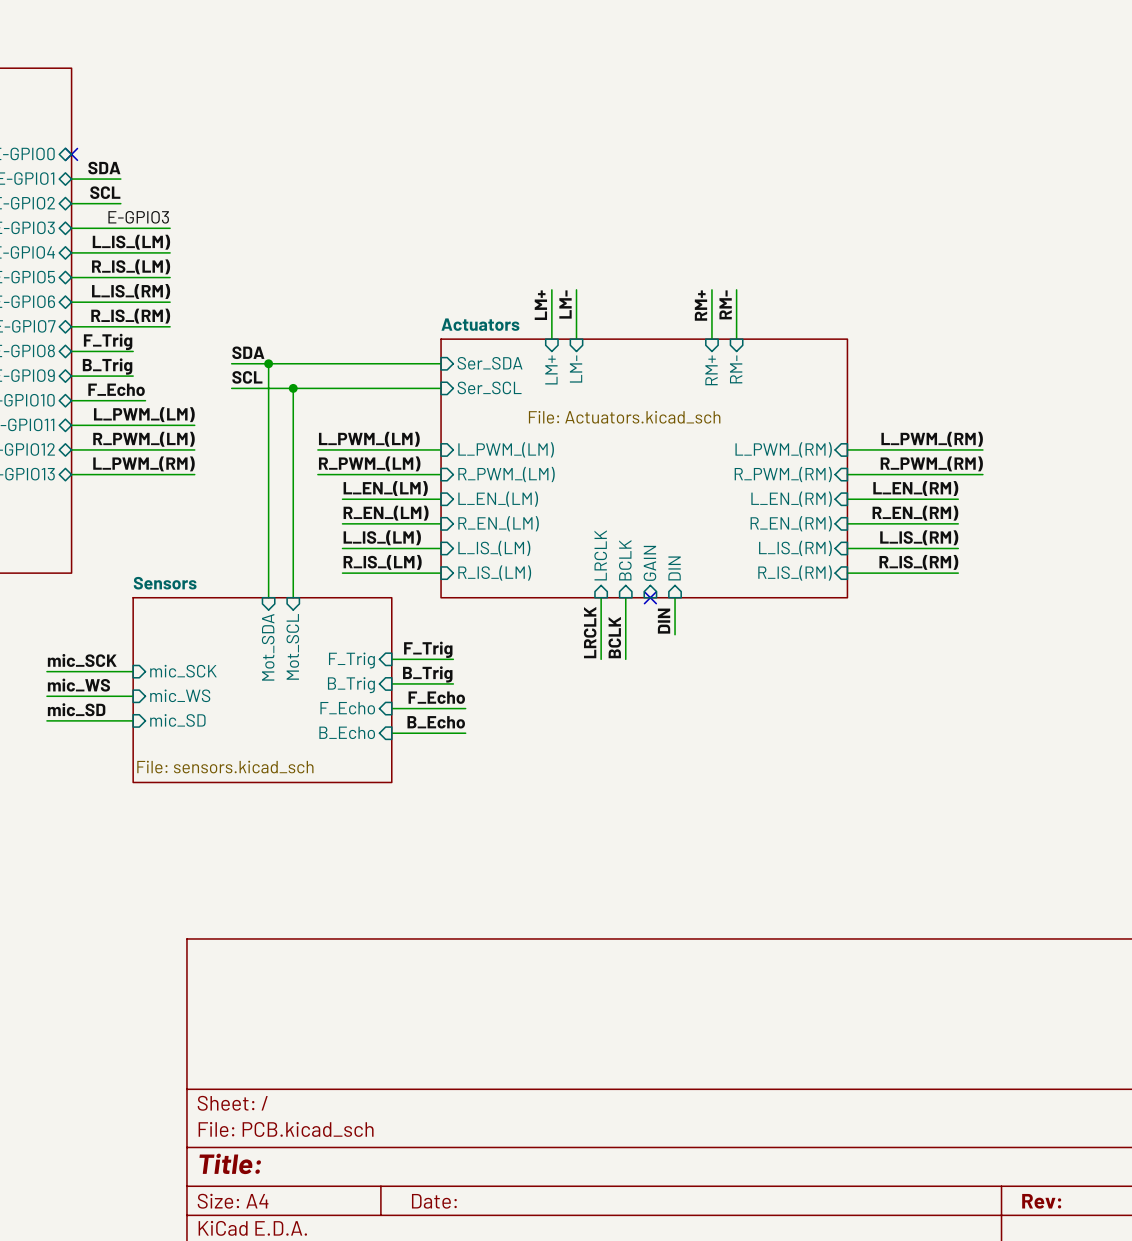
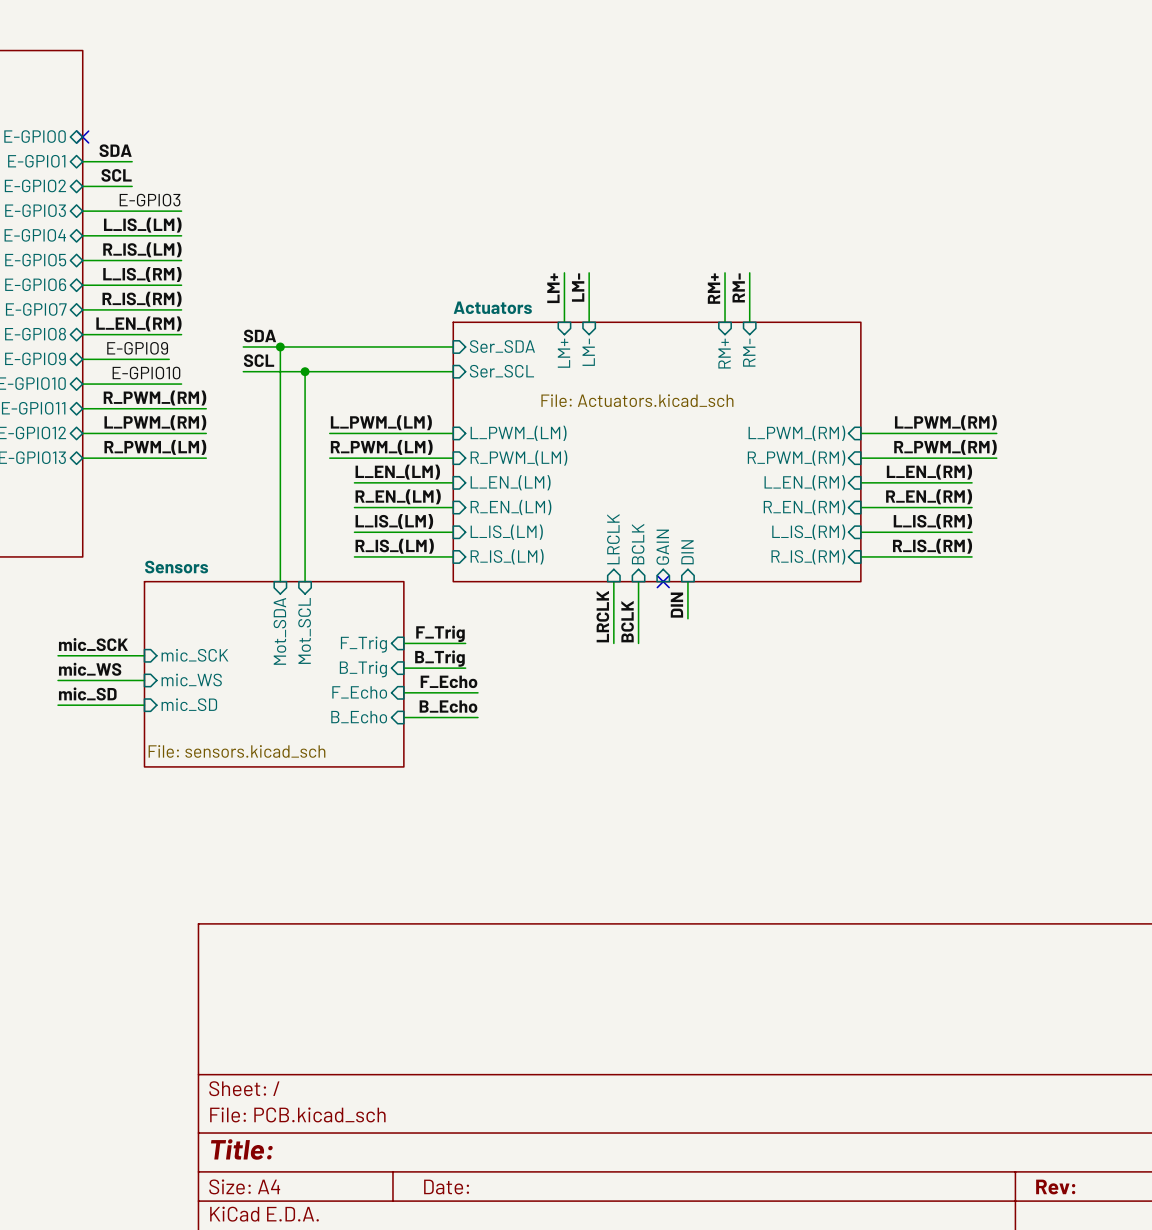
label: none -> L_EN_(RM) (138, 323)
label: F_Trig (108, 341) -> none
wire: none -> (144, 334) (181, 334)
label: none -> E-GPIO9 (137, 348)
label: B_Trig (107, 366) -> none
wire: none -> (144, 359) (169, 359)
label: F_Echo (116, 389) -> none
label: none -> E-GPIO10 (146, 373)
wire: none -> (156, 384) (181, 384)
label: L_PWM_(LM) (144, 414) -> R_PWM_(RM) (154, 398)
label: R_PWM_(LM) (143, 439) -> L_PWM_(RM) (155, 422)
label: L_PWM_(RM) (143, 463) -> R_PWM_(LM) (155, 447)

